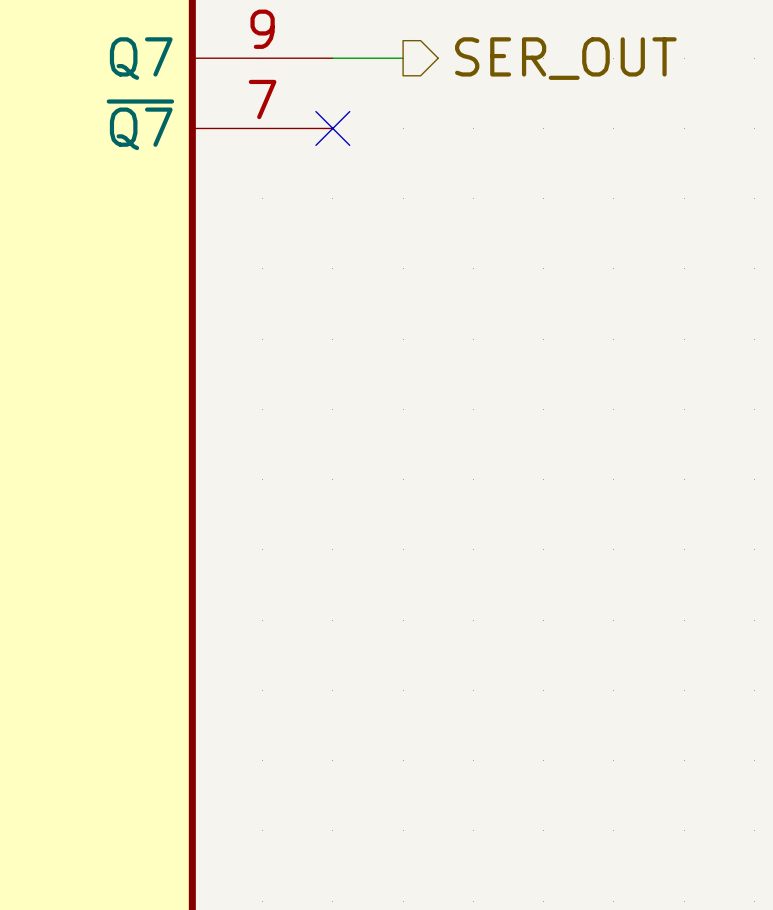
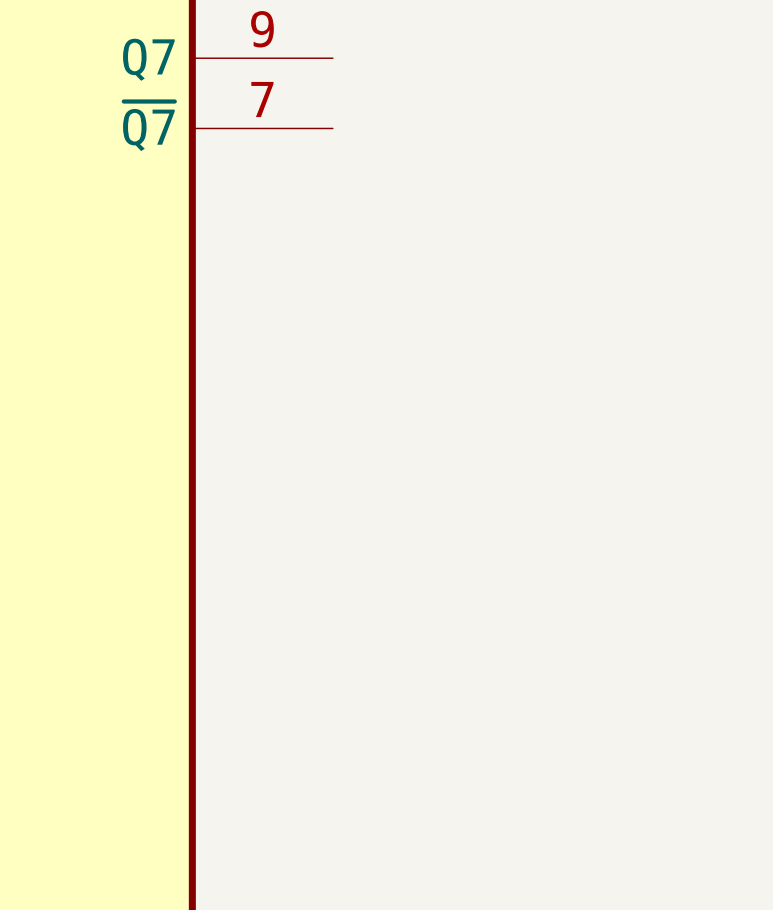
wire: (332, 58) (403, 58) -> none
hierarchical label: SER_OUT (565, 58) -> none
no-connect mark: (332, 128) -> none

